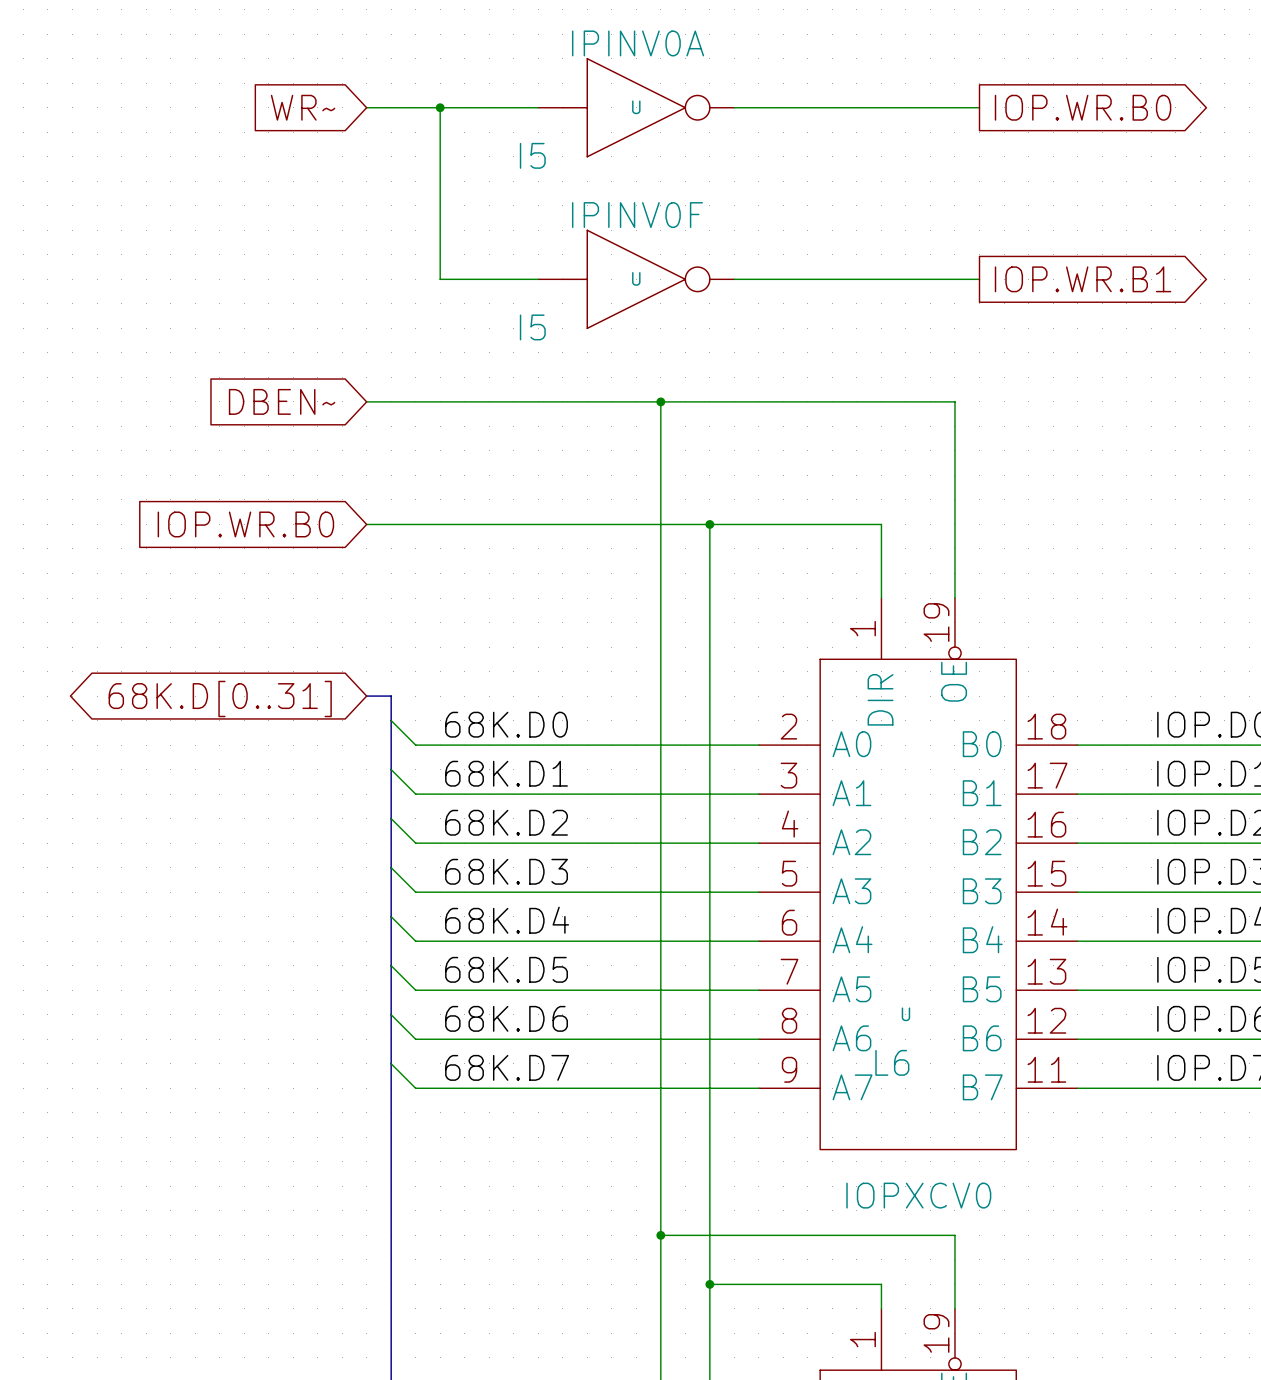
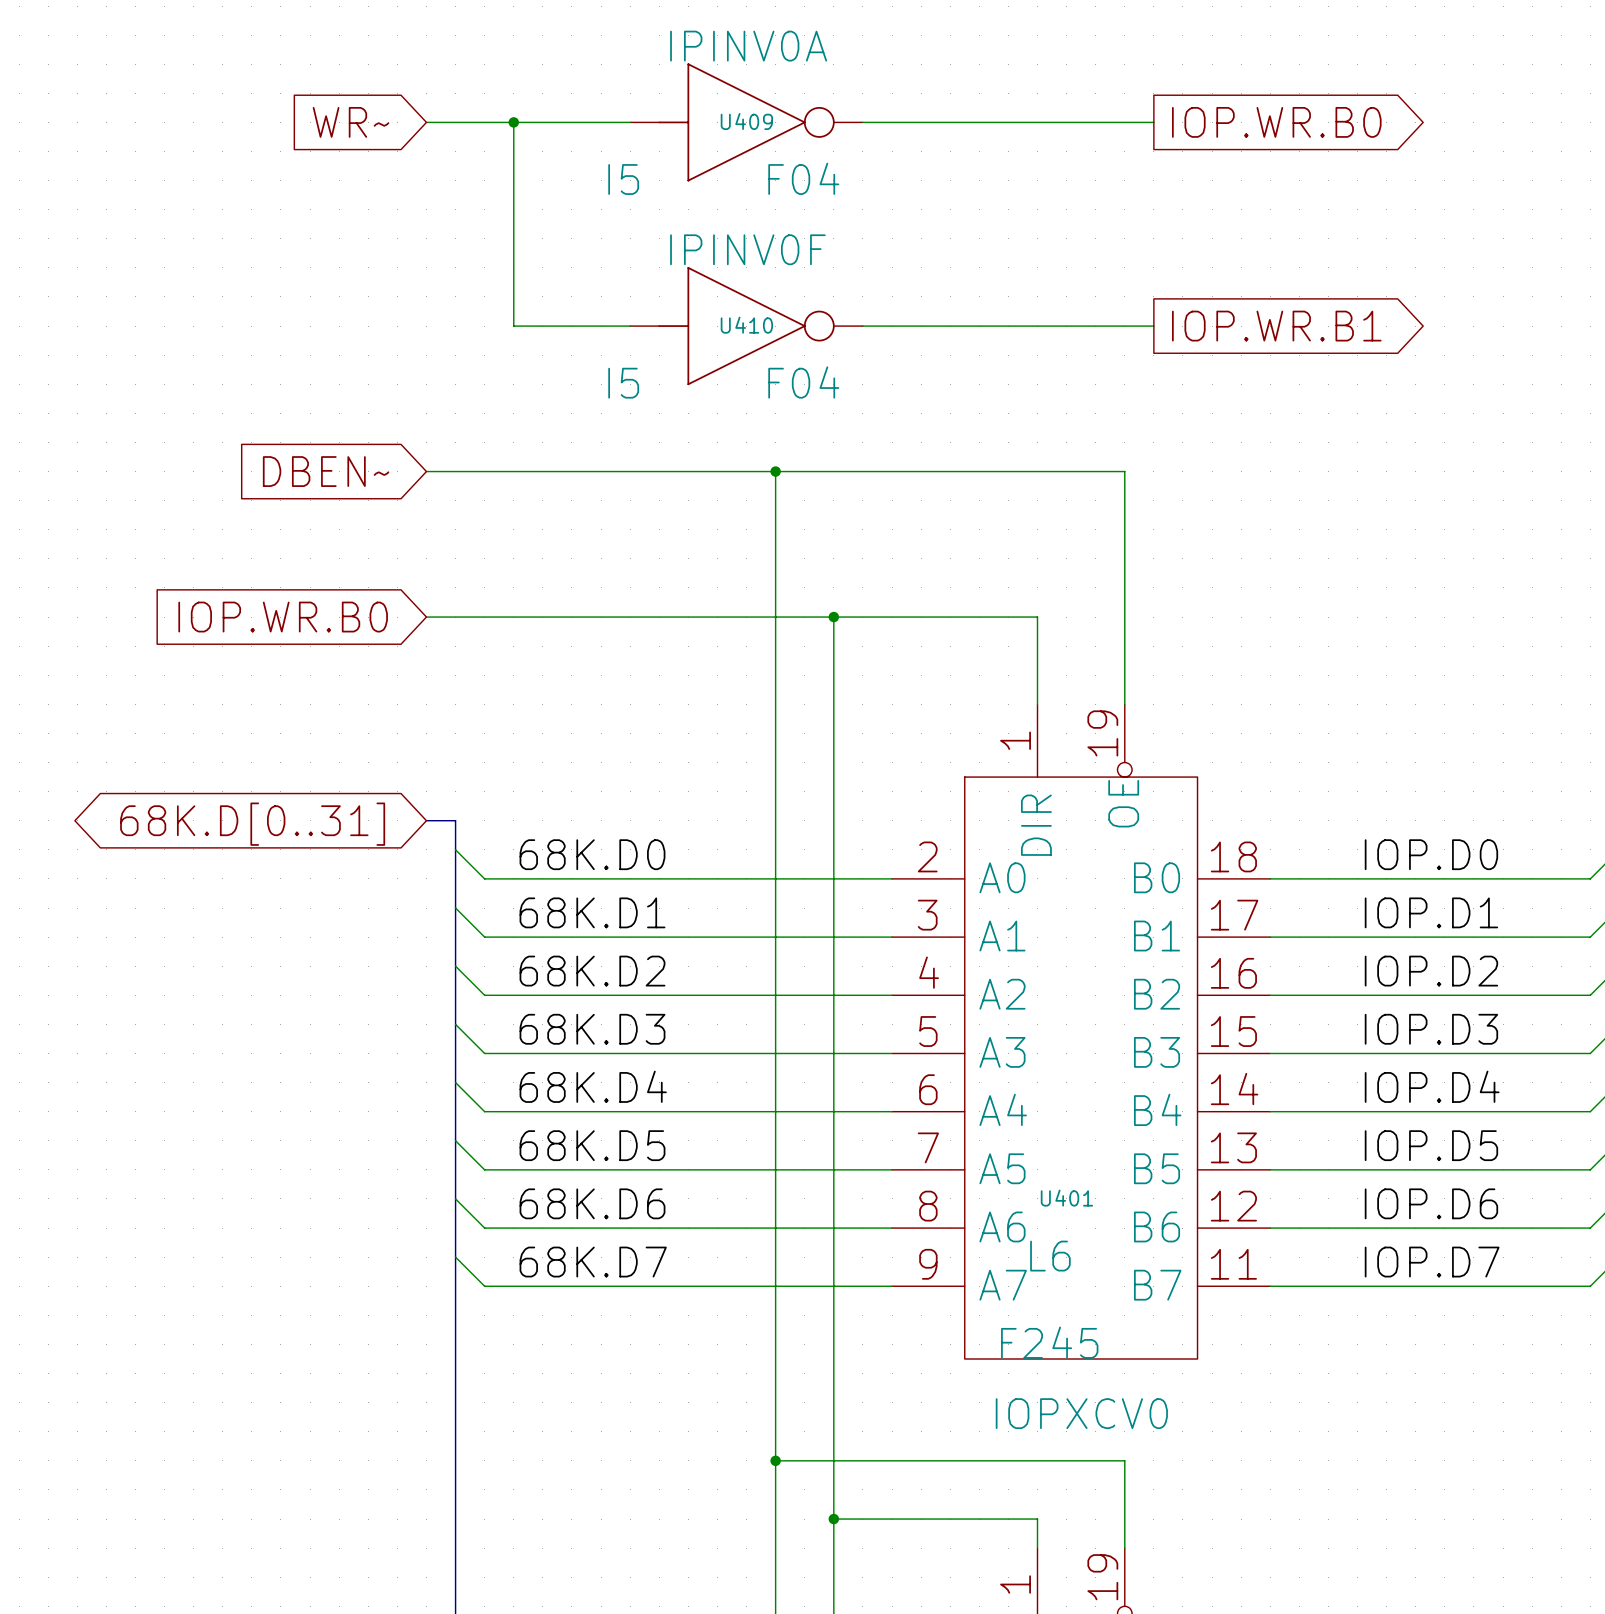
U name: U (636, 107) -> U409 (746, 121)
U value: none -> F04 (803, 178)
U name: U (636, 278) -> U410 (746, 325)
U value: none -> F04 (803, 382)
U name: U (905, 1014) -> U401 (1066, 1198)
U value: none -> F245 (1049, 1342)

